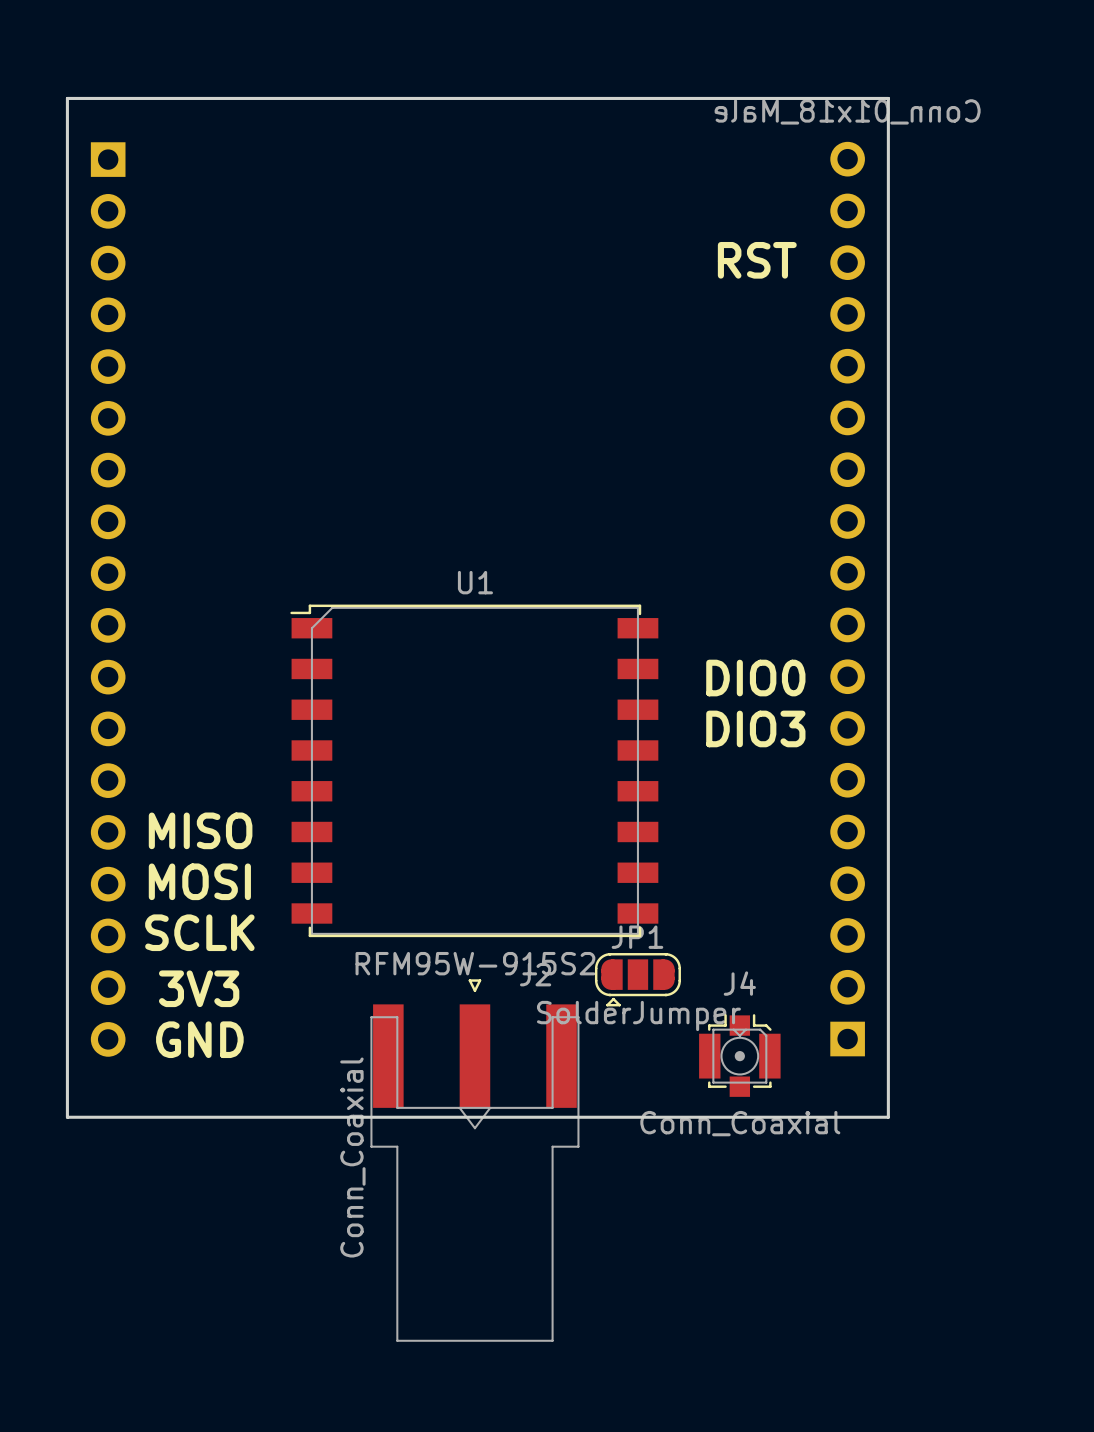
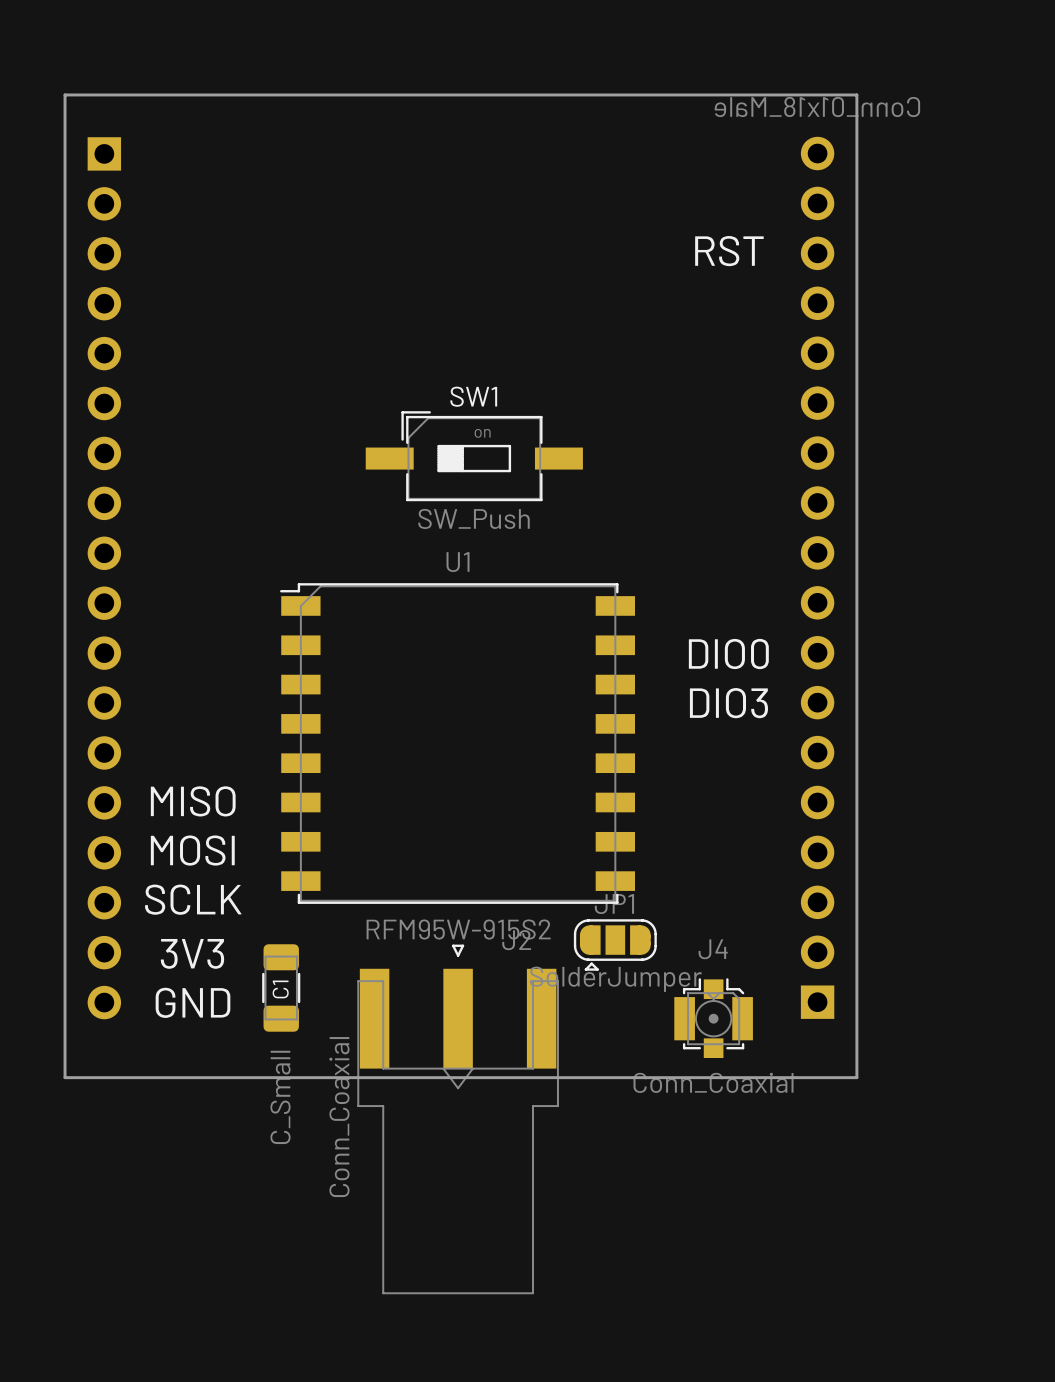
SW1: none -> SW_Push (474, 456)
C1: none -> C_Small (281, 987)

